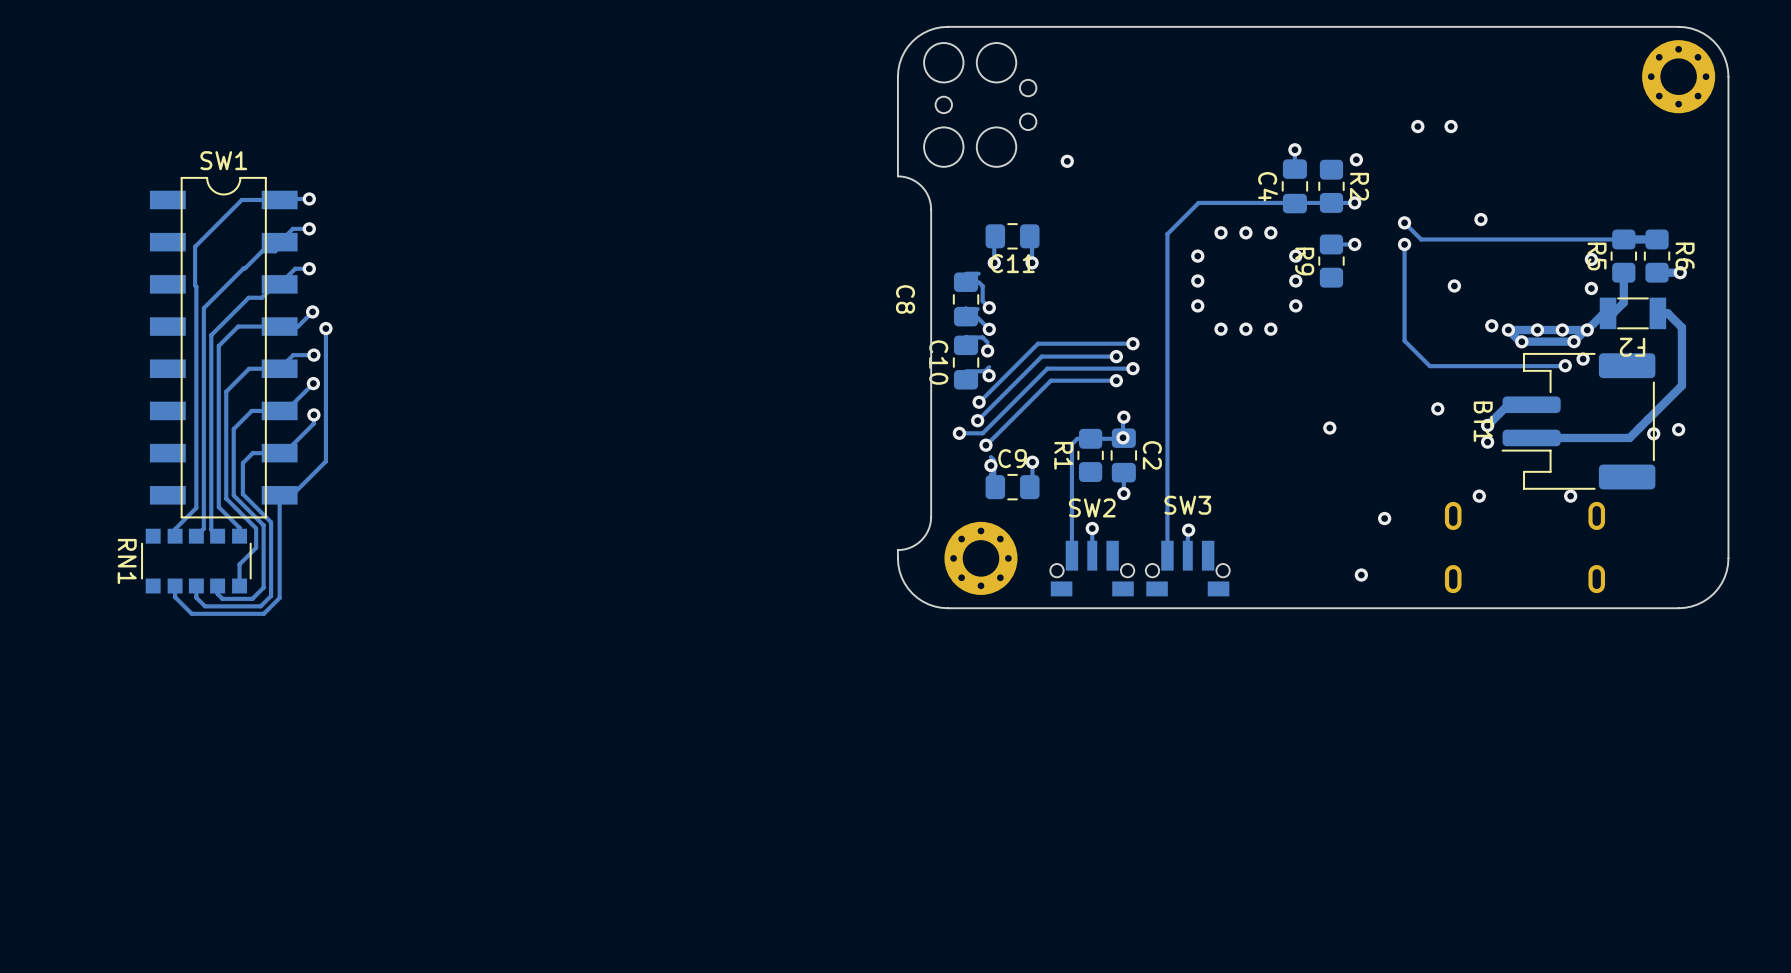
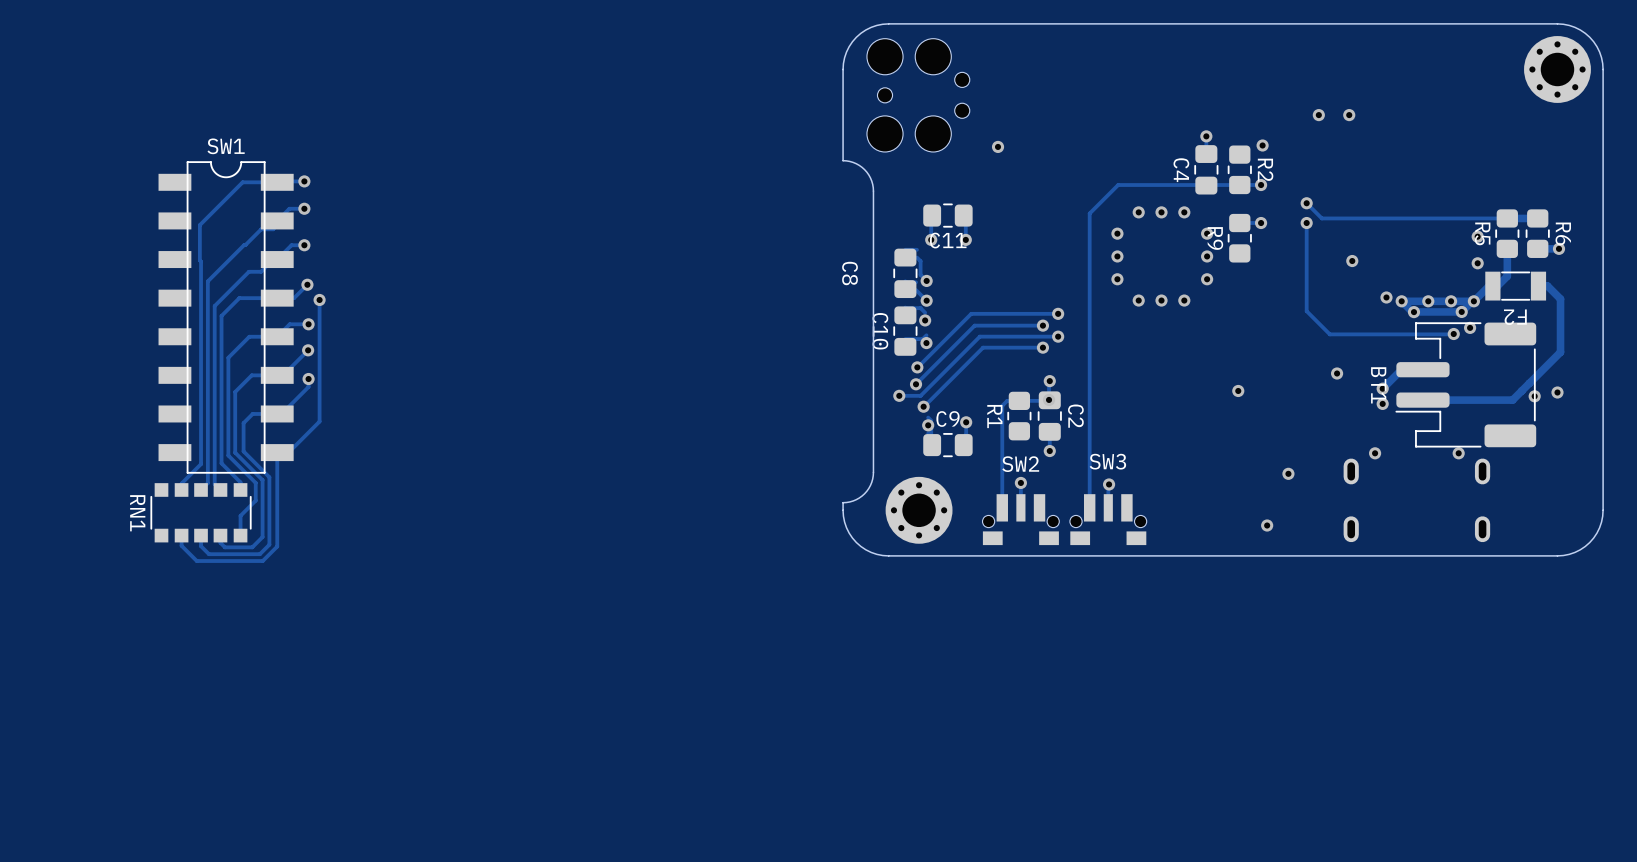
via: (1480, 219) -> none

